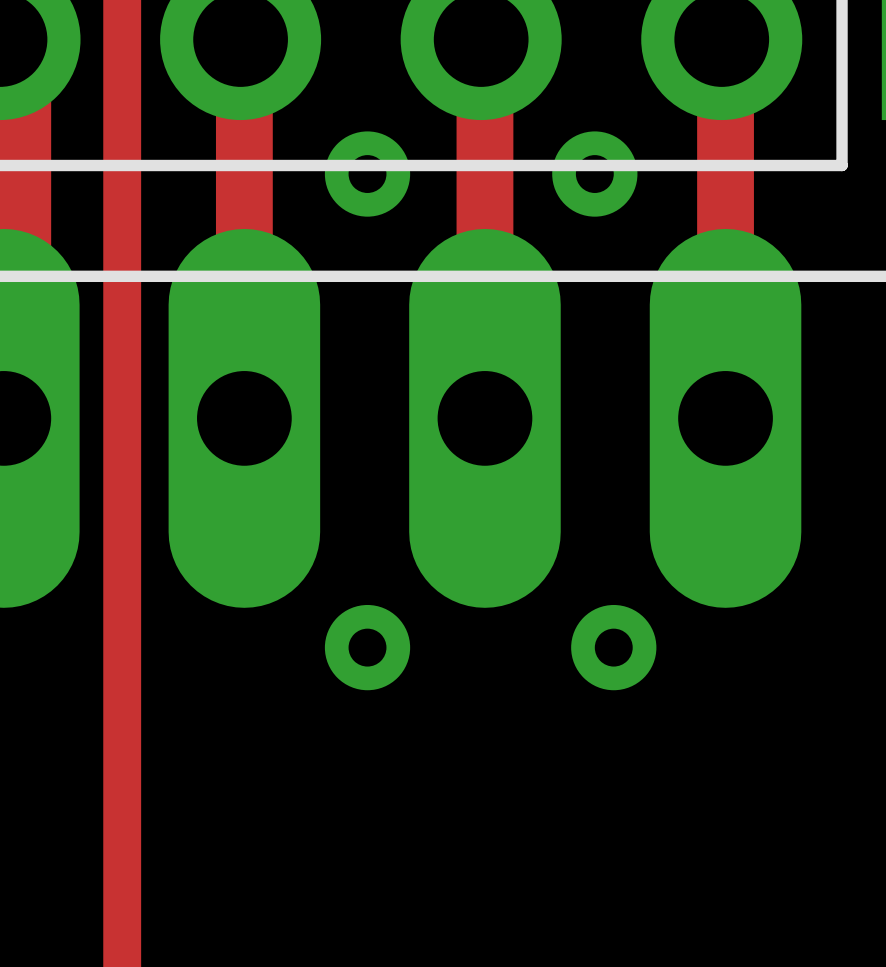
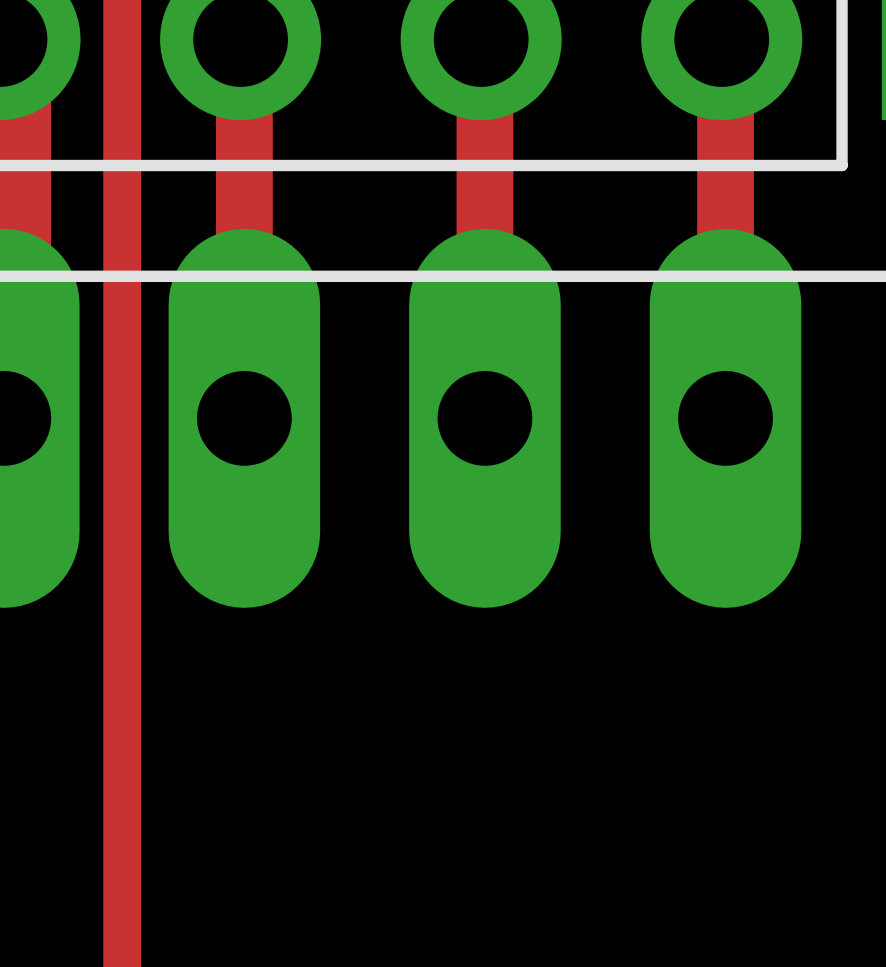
via: (367, 174) -> none
via: (594, 174) -> none
via: (367, 647) -> none
via: (613, 647) -> none

